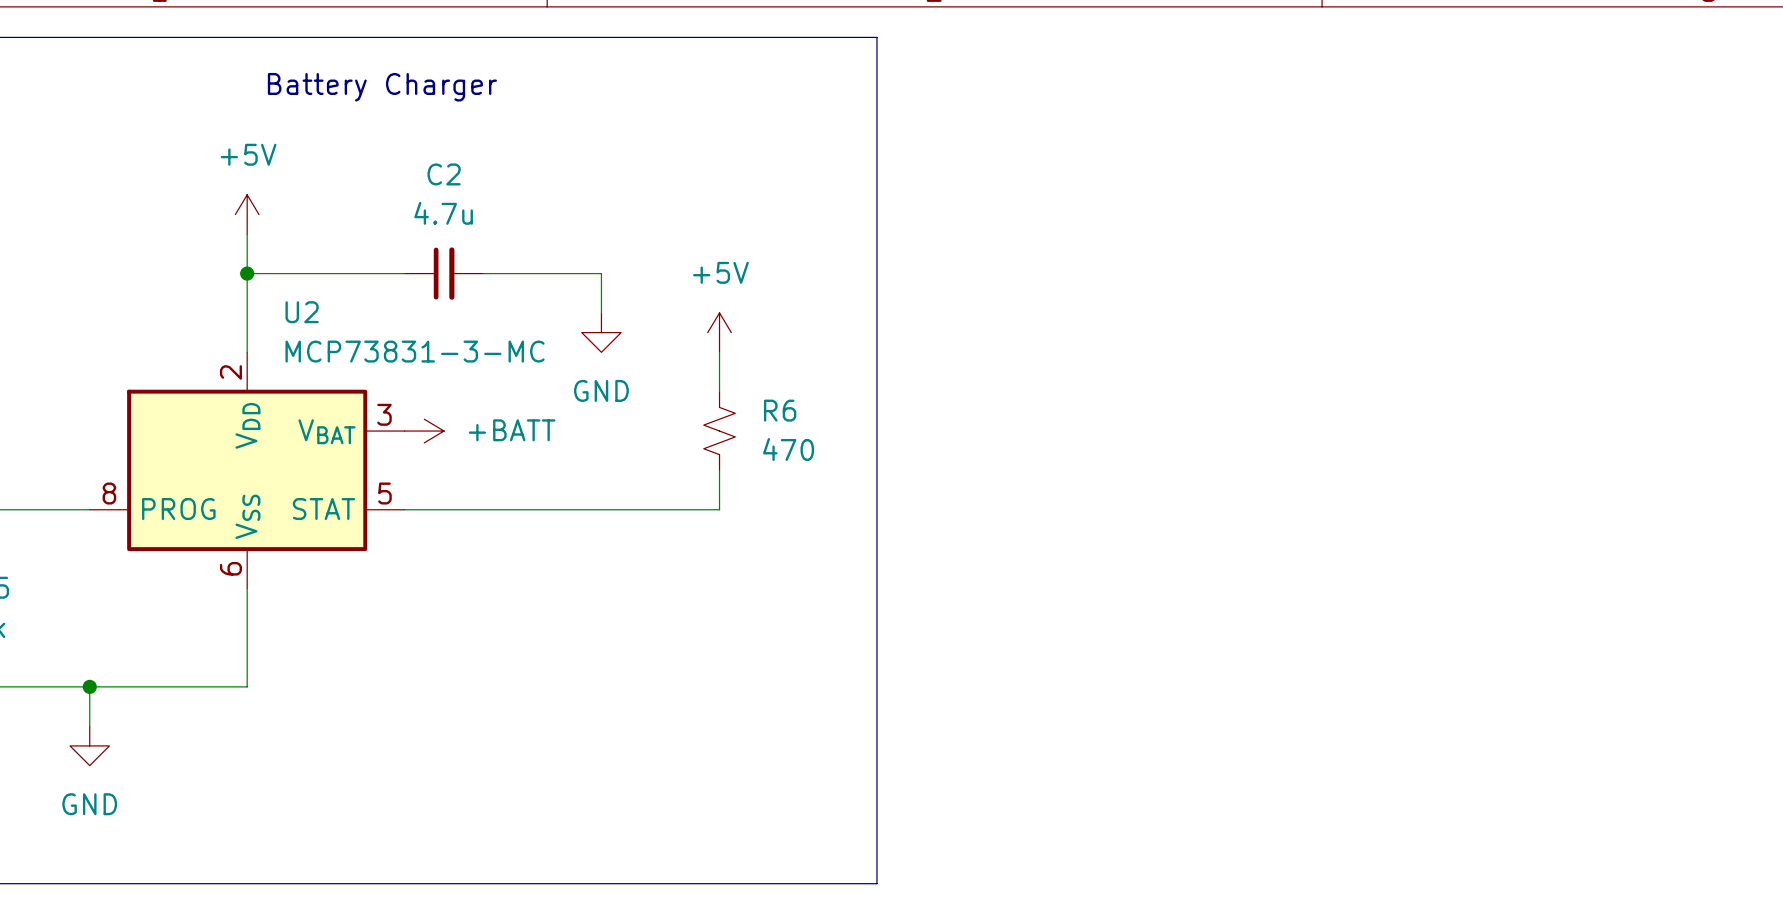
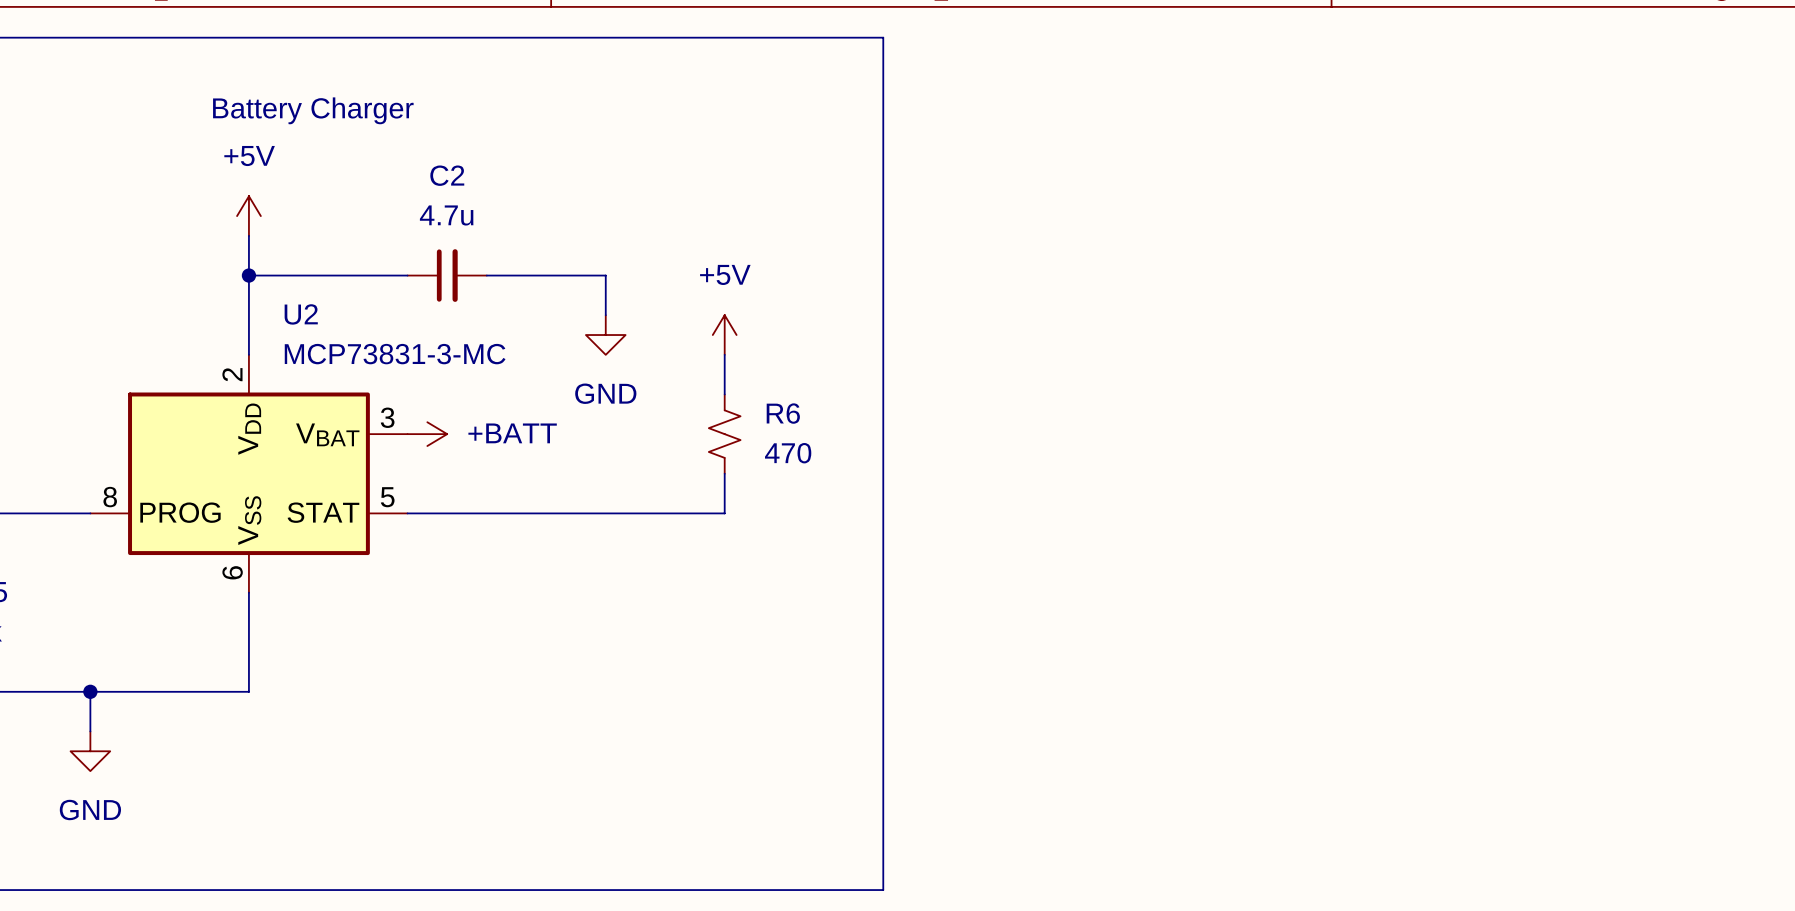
text position: Battery Charger (382, 87) -> Battery Charger (313, 110)

